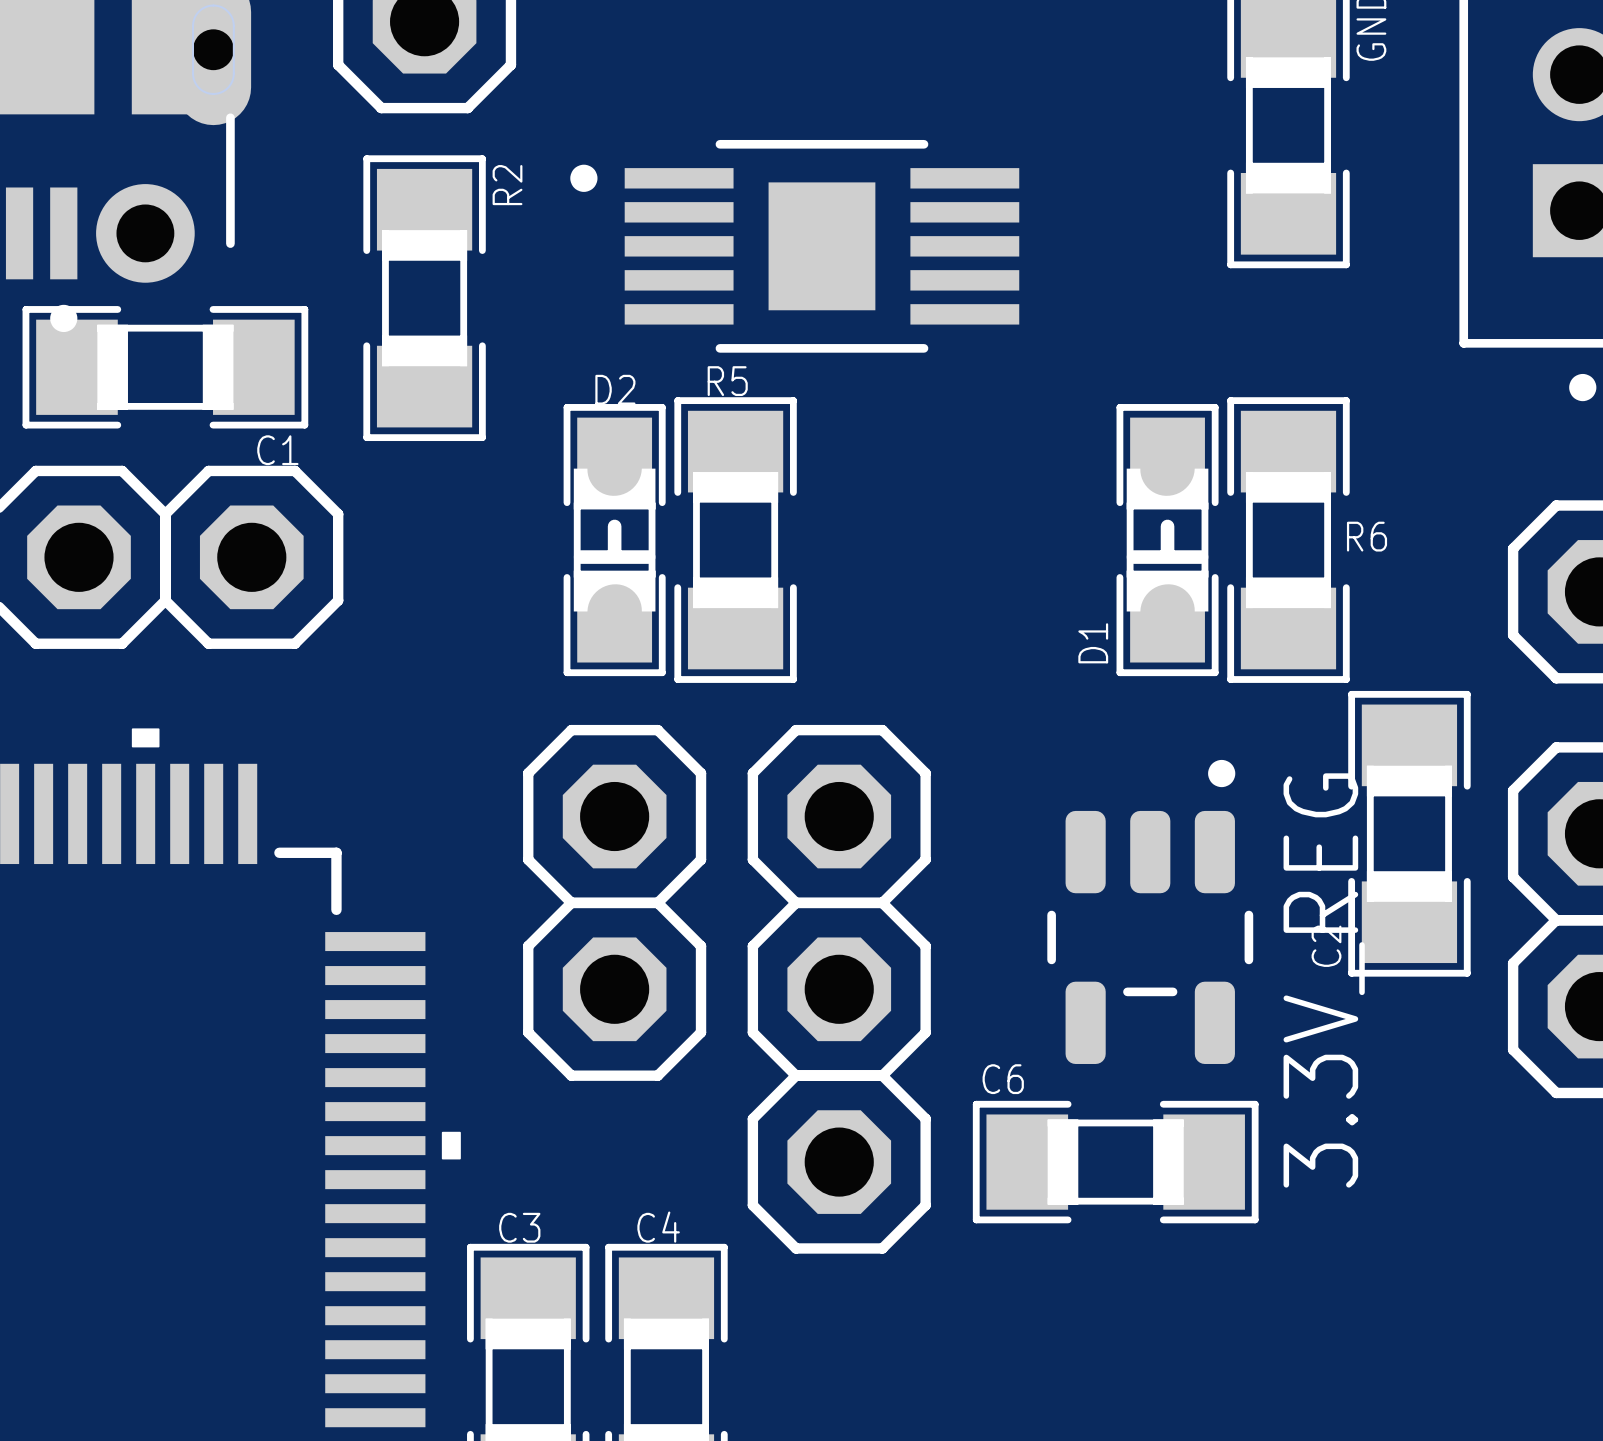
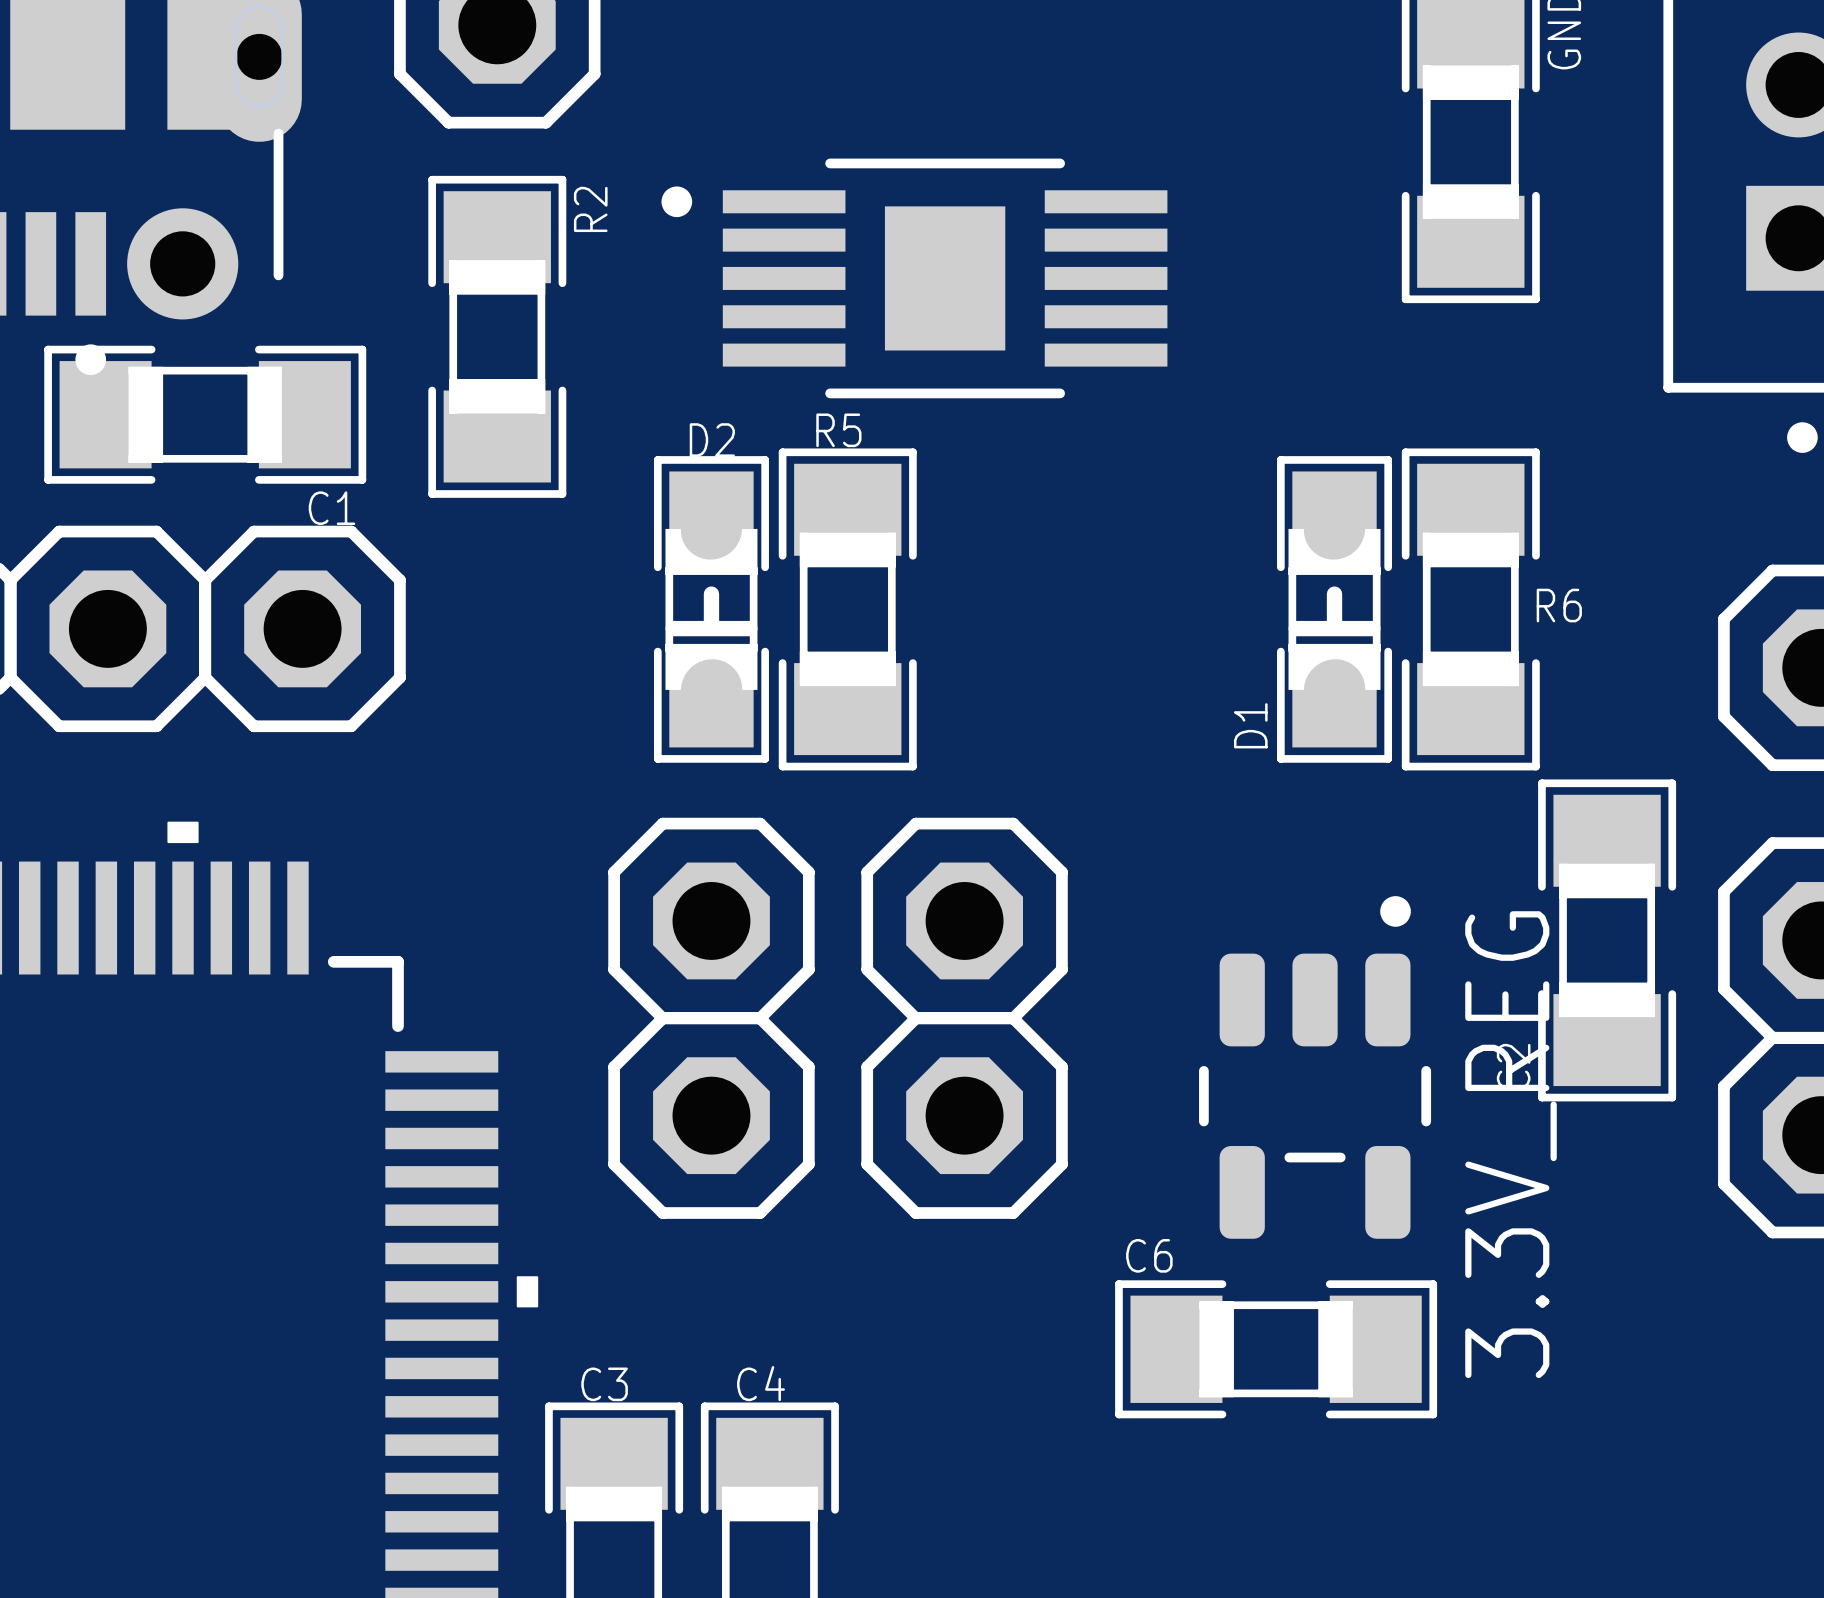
3.3V_REG position: (1150, 911) -> (1315, 1067)
part: (839, 1162) -> none
C6 position: (1115, 1162) -> (1276, 1349)

